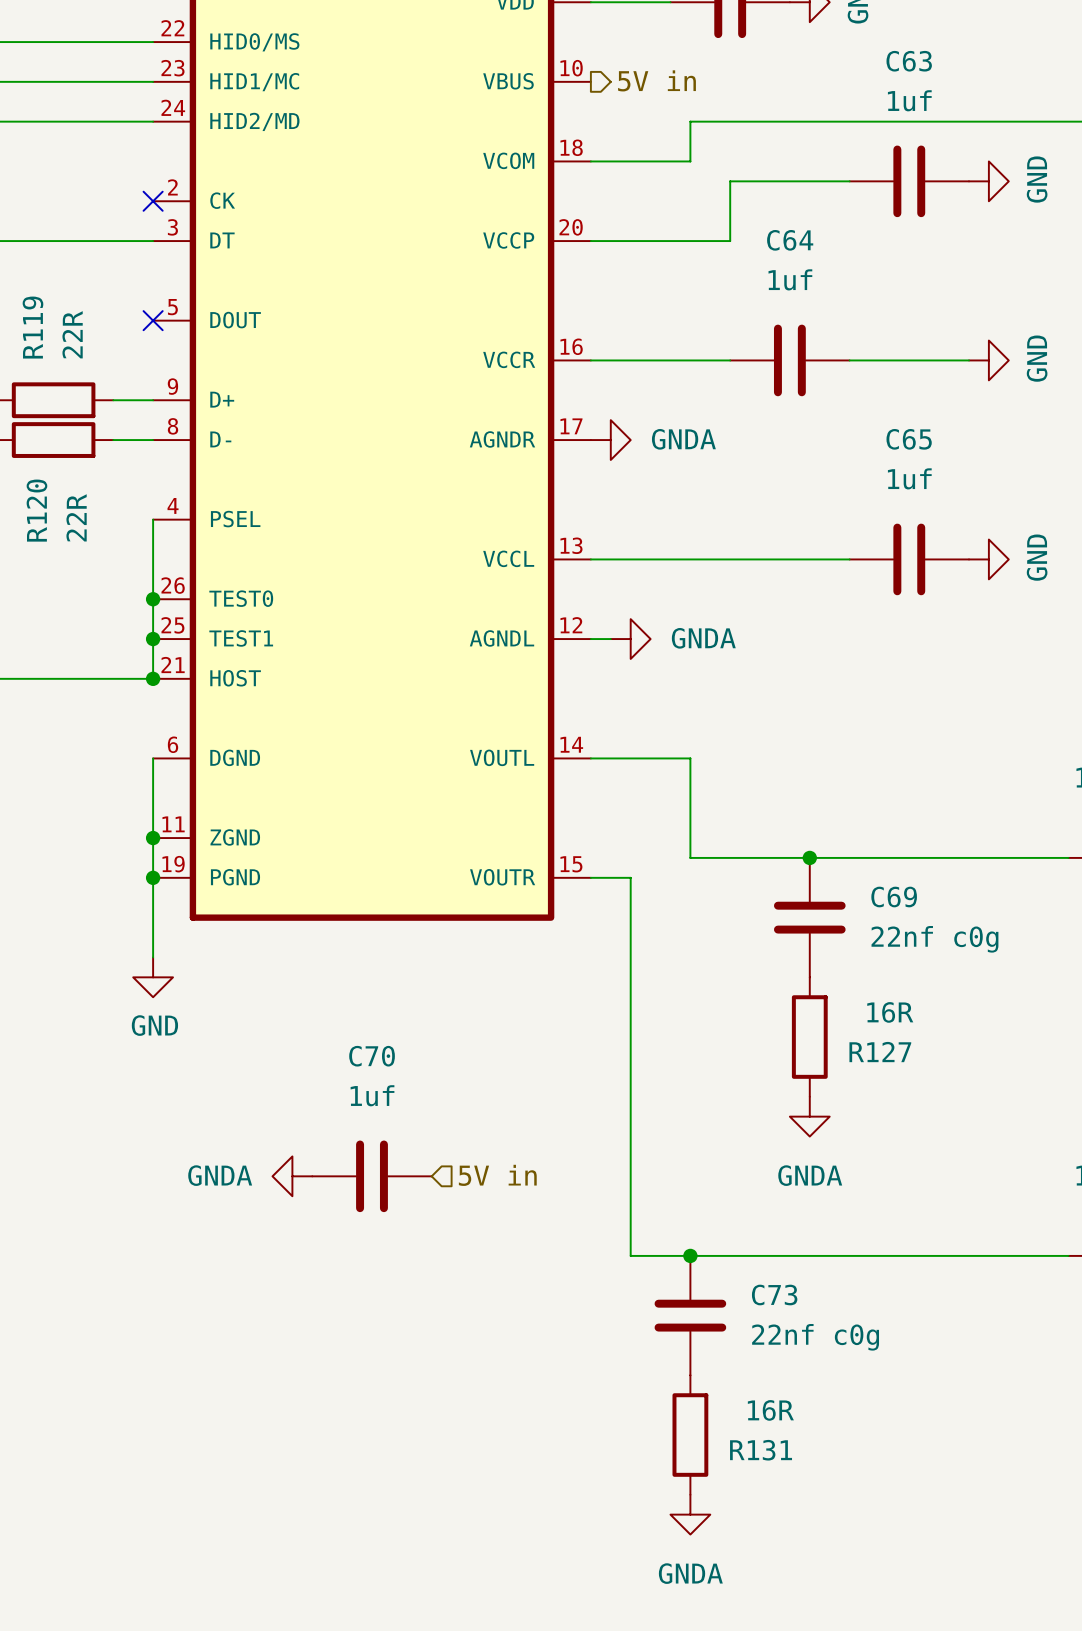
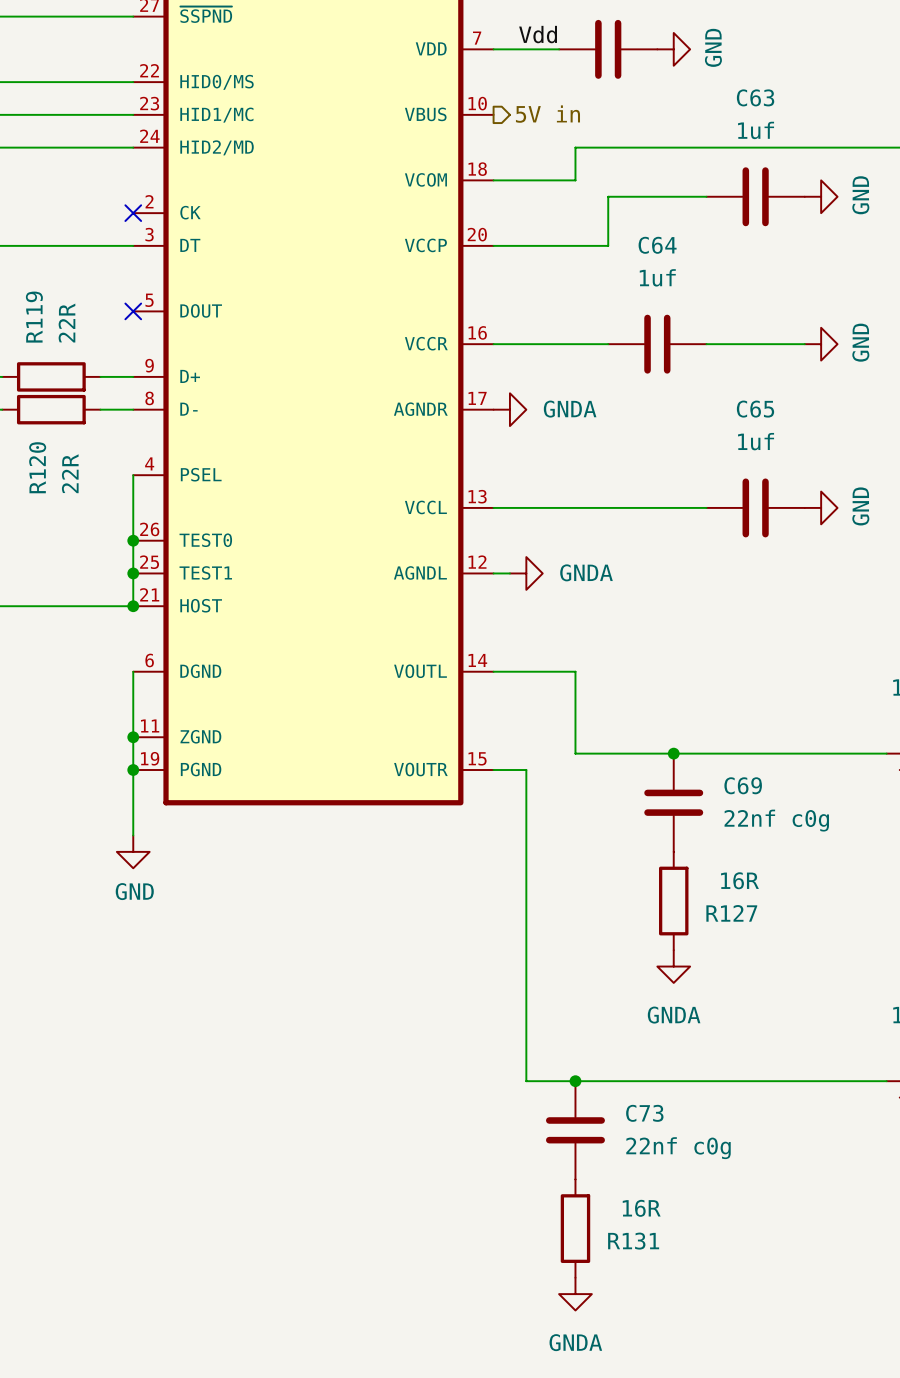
hierarchical label: 5V in (497, 1175) -> none
power symbol: GNDA (292, 1176) -> none
C70: 1uf (372, 1176) -> none

